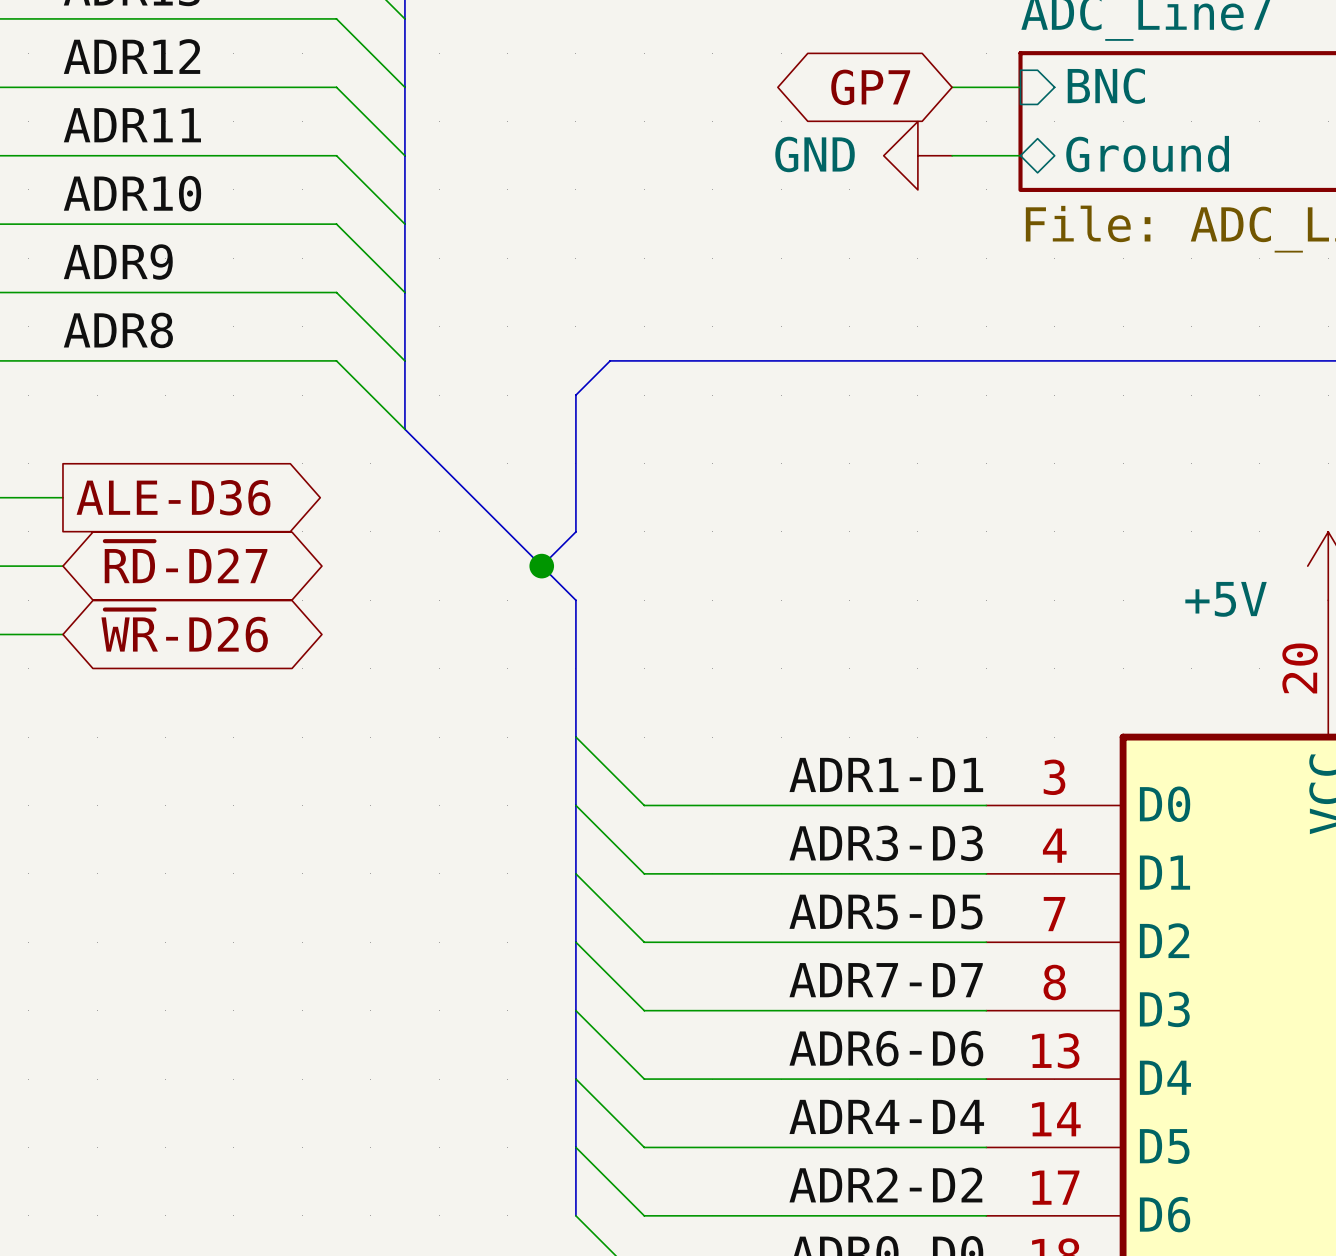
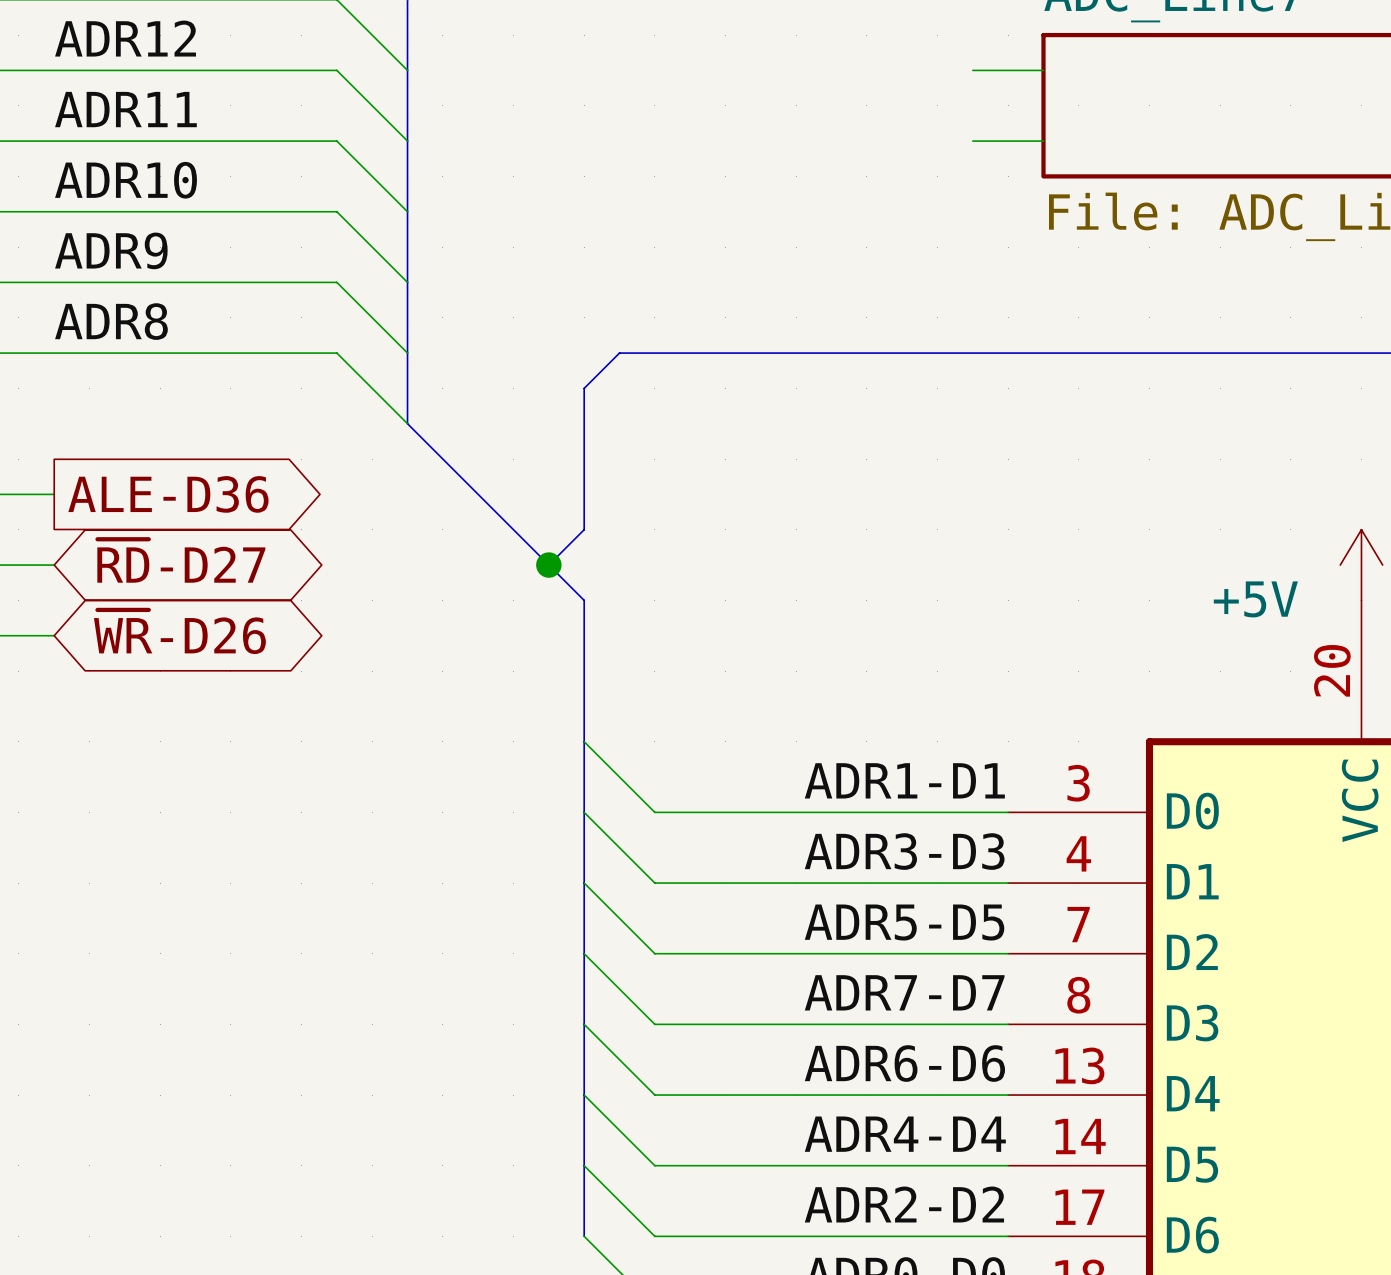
sheet pin: BNC (1106, 86) -> none
global label: GP7 (870, 87) -> none
sheet pin: Ground (1147, 154) -> none
power symbol: GND (917, 155) -> none

